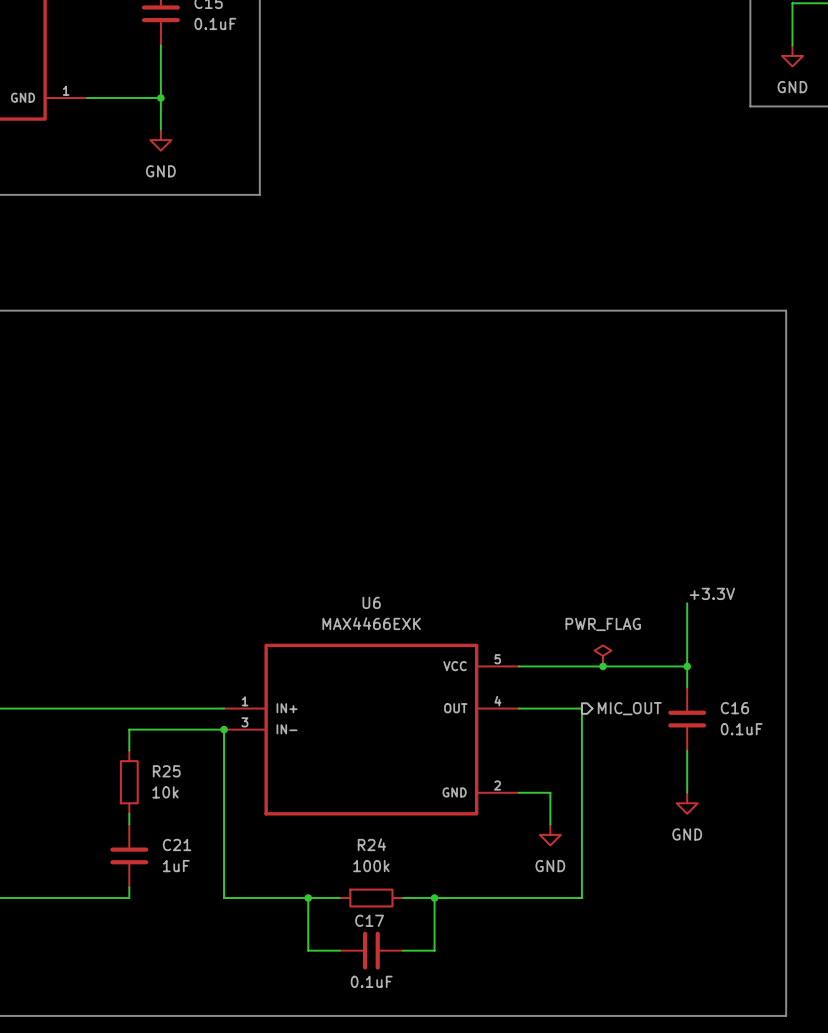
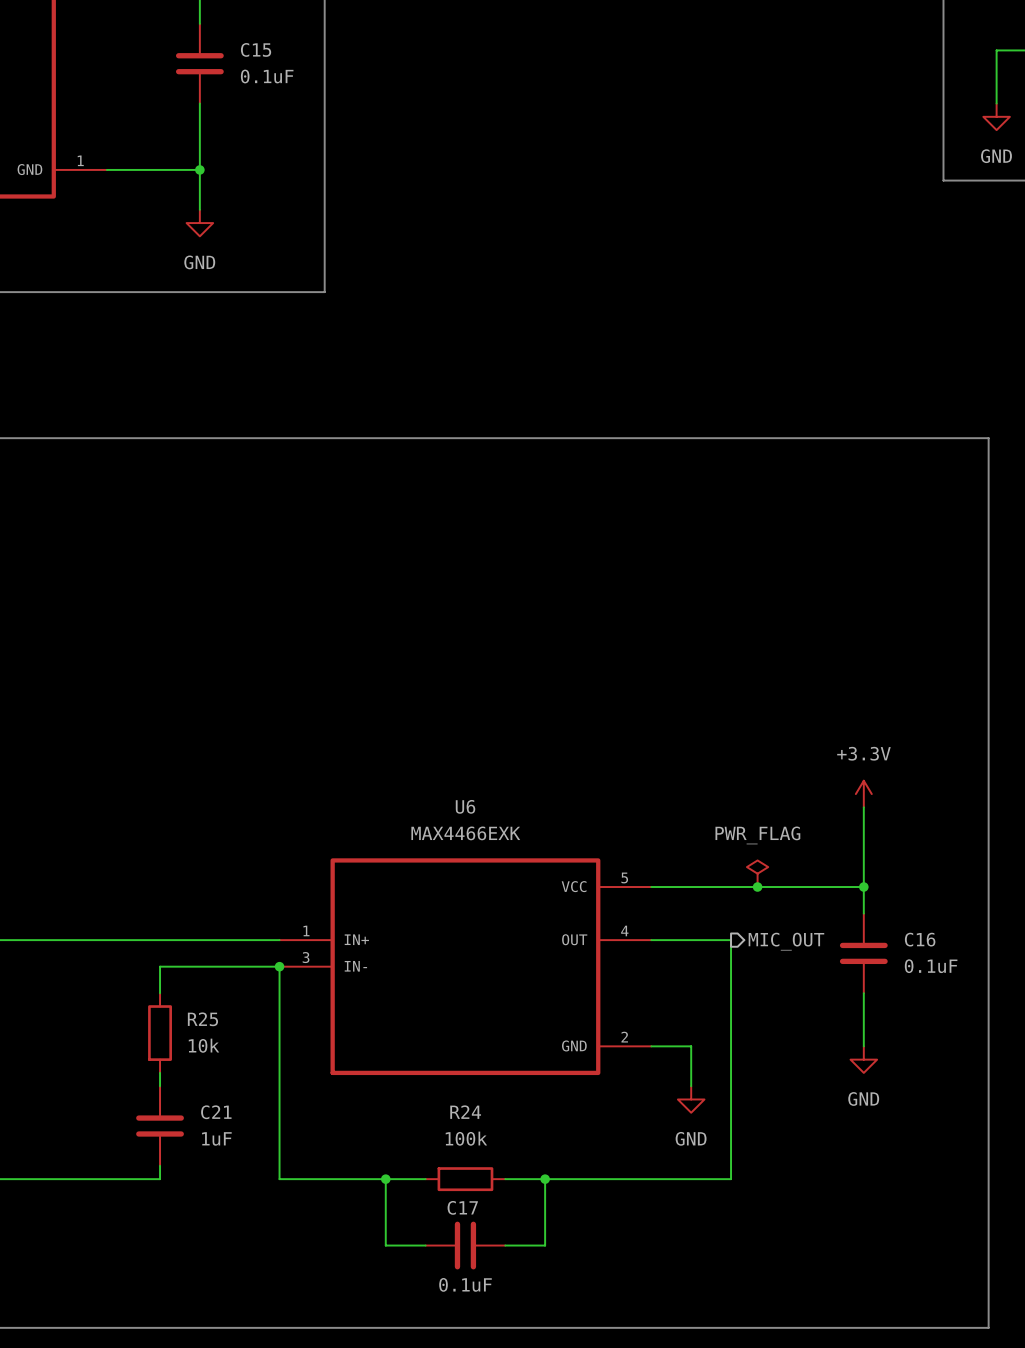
power symbol: none -> +3.3V (863, 794)
label: +3.3V (712, 593) -> none

